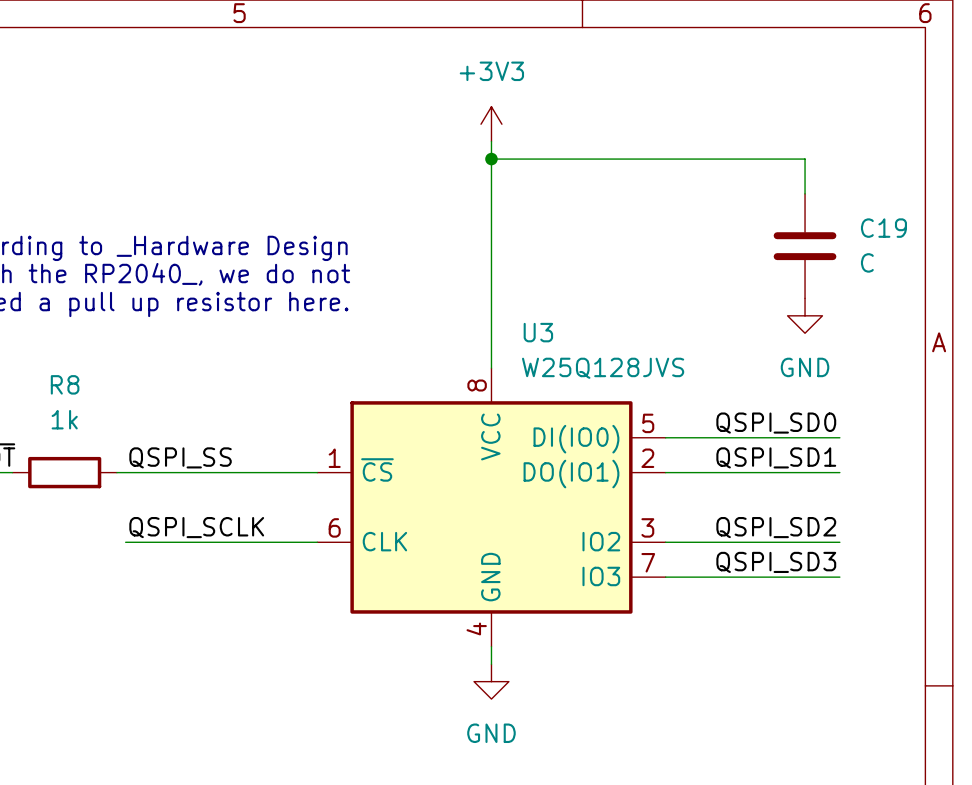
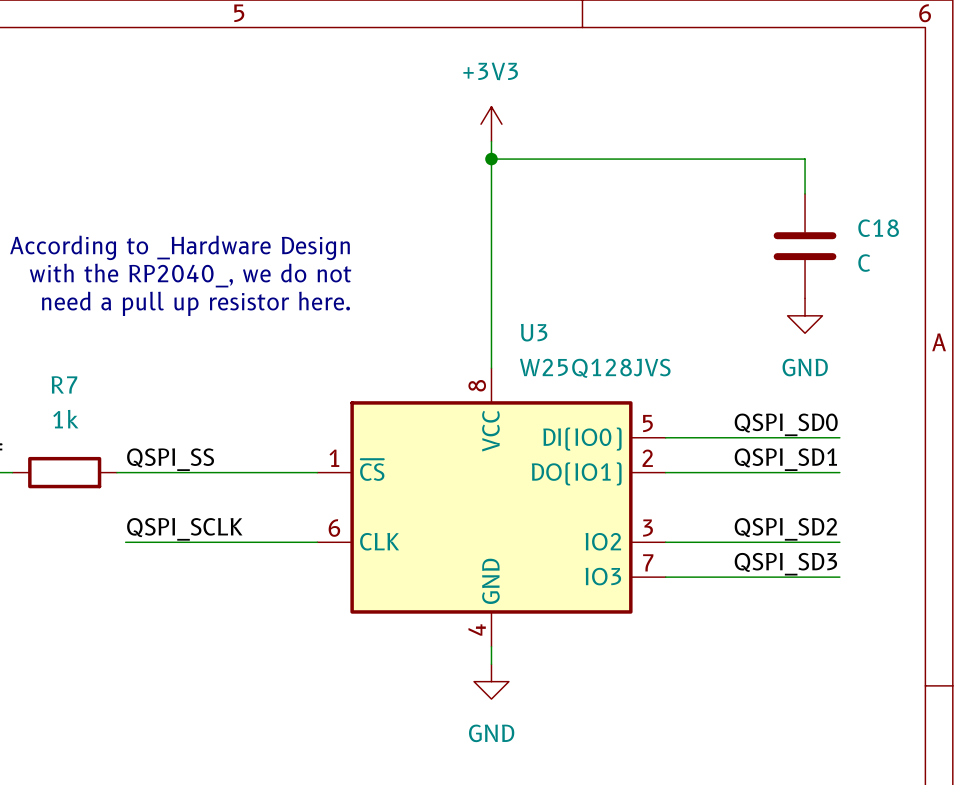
C19 name: C19 (883, 228) -> C18 (878, 228)
R8 name: R8 (65, 384) -> R7 (64, 384)

